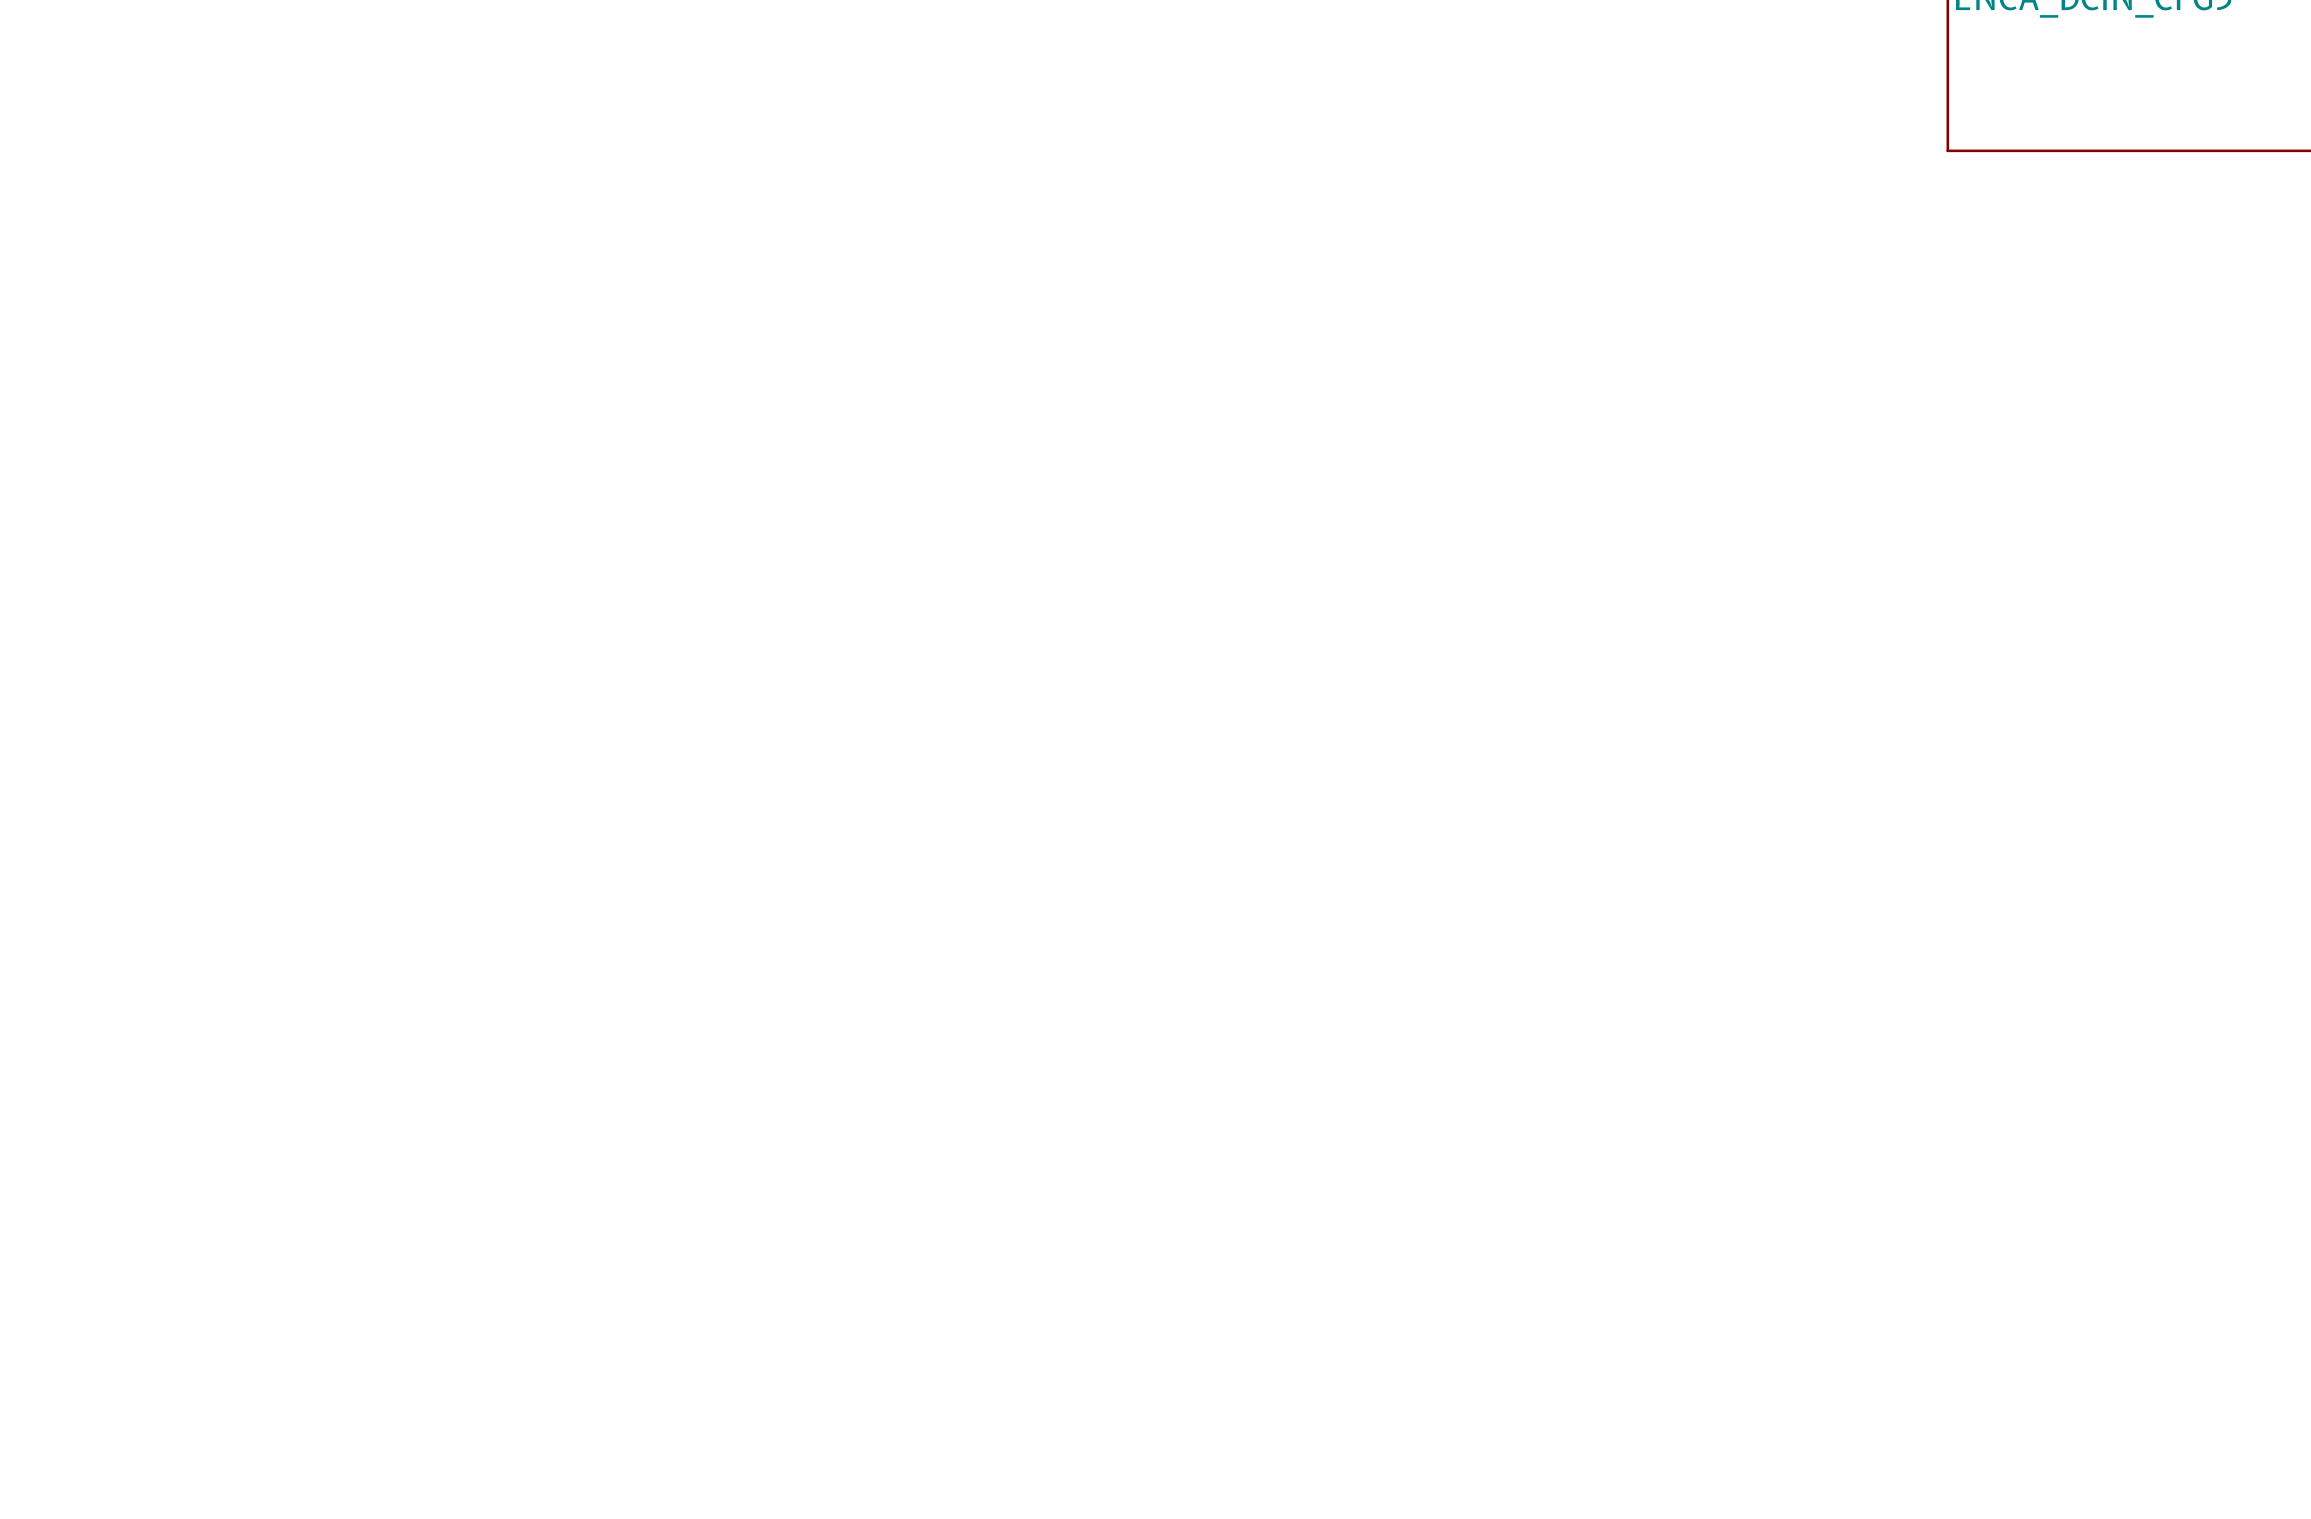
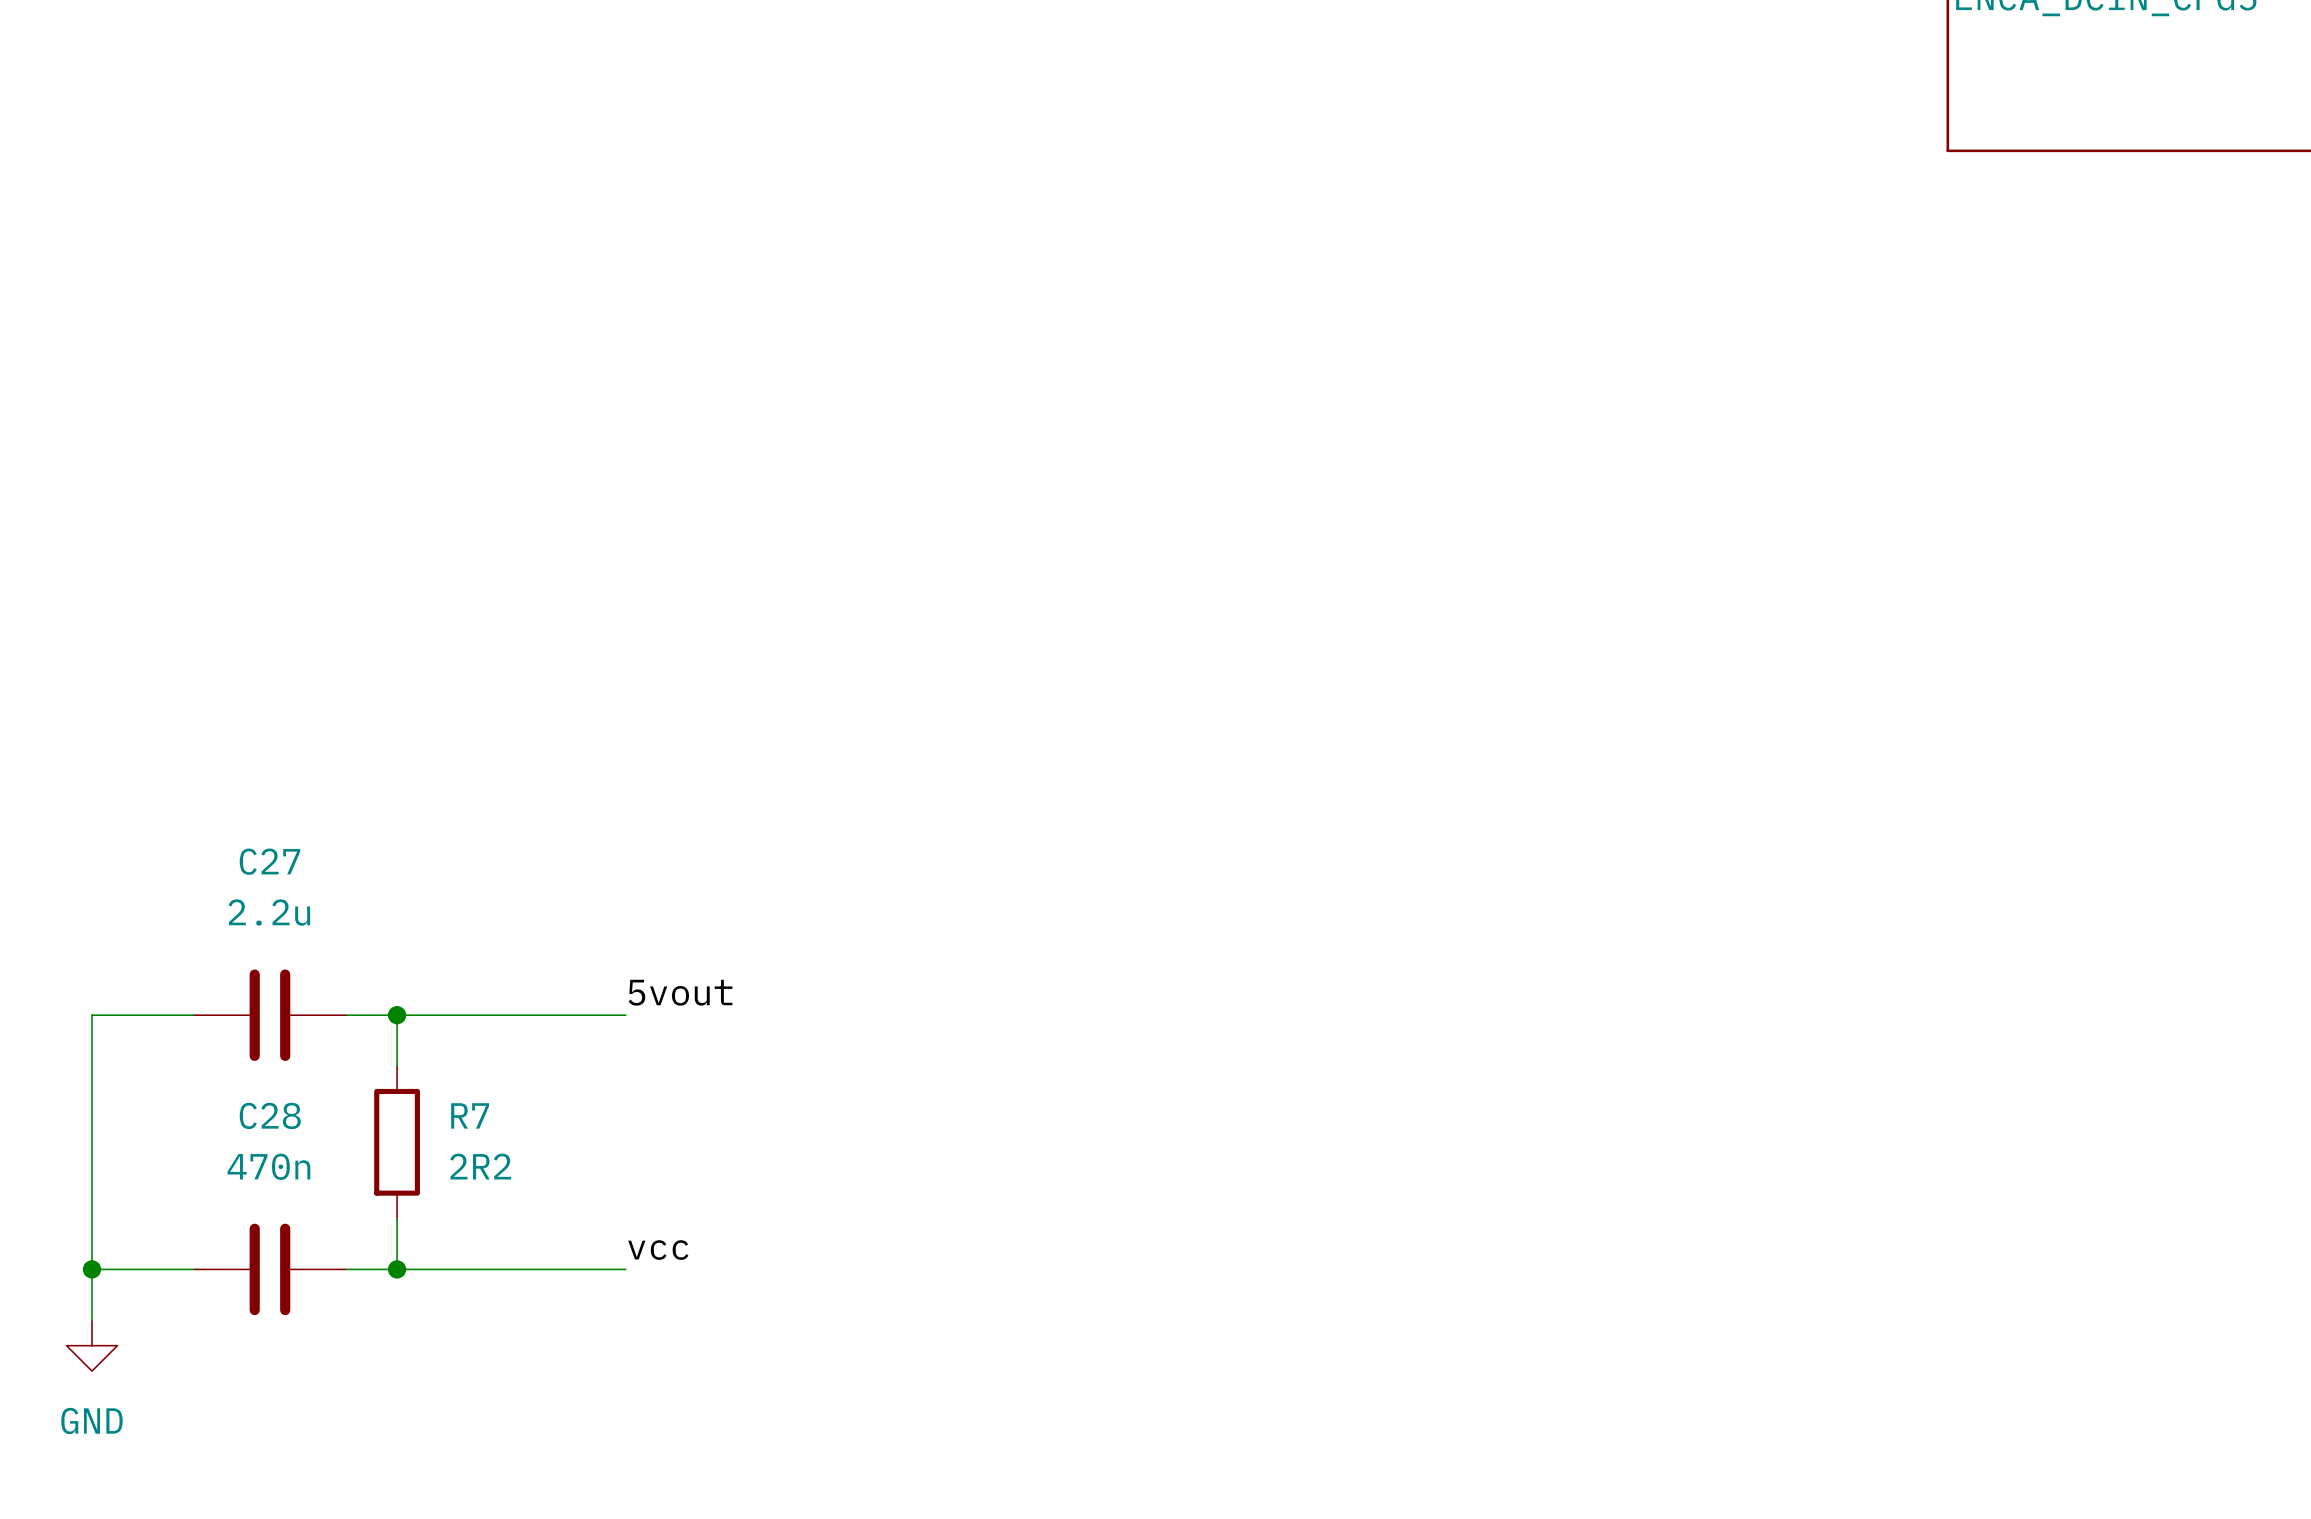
label: none -> 5vout (680, 992)
wire: none -> (193, 1015) (92, 1015) (92, 1320)
C27: none -> 2.2u (269, 1015)
wire: none -> (346, 1015) (625, 1015)
wire: none -> (397, 1015) (397, 1066)
junction: none -> (397, 1015)
R7: none -> 2R2 (397, 1142)
wire: none -> (397, 1218) (397, 1269)
label: none -> vcc (658, 1250)
wire: none -> (92, 1269) (193, 1269)
junction: none -> (92, 1269)
C28: none -> 470n (269, 1269)
wire: none -> (346, 1269) (625, 1269)
junction: none -> (397, 1269)
power symbol: none -> GND (92, 1345)

